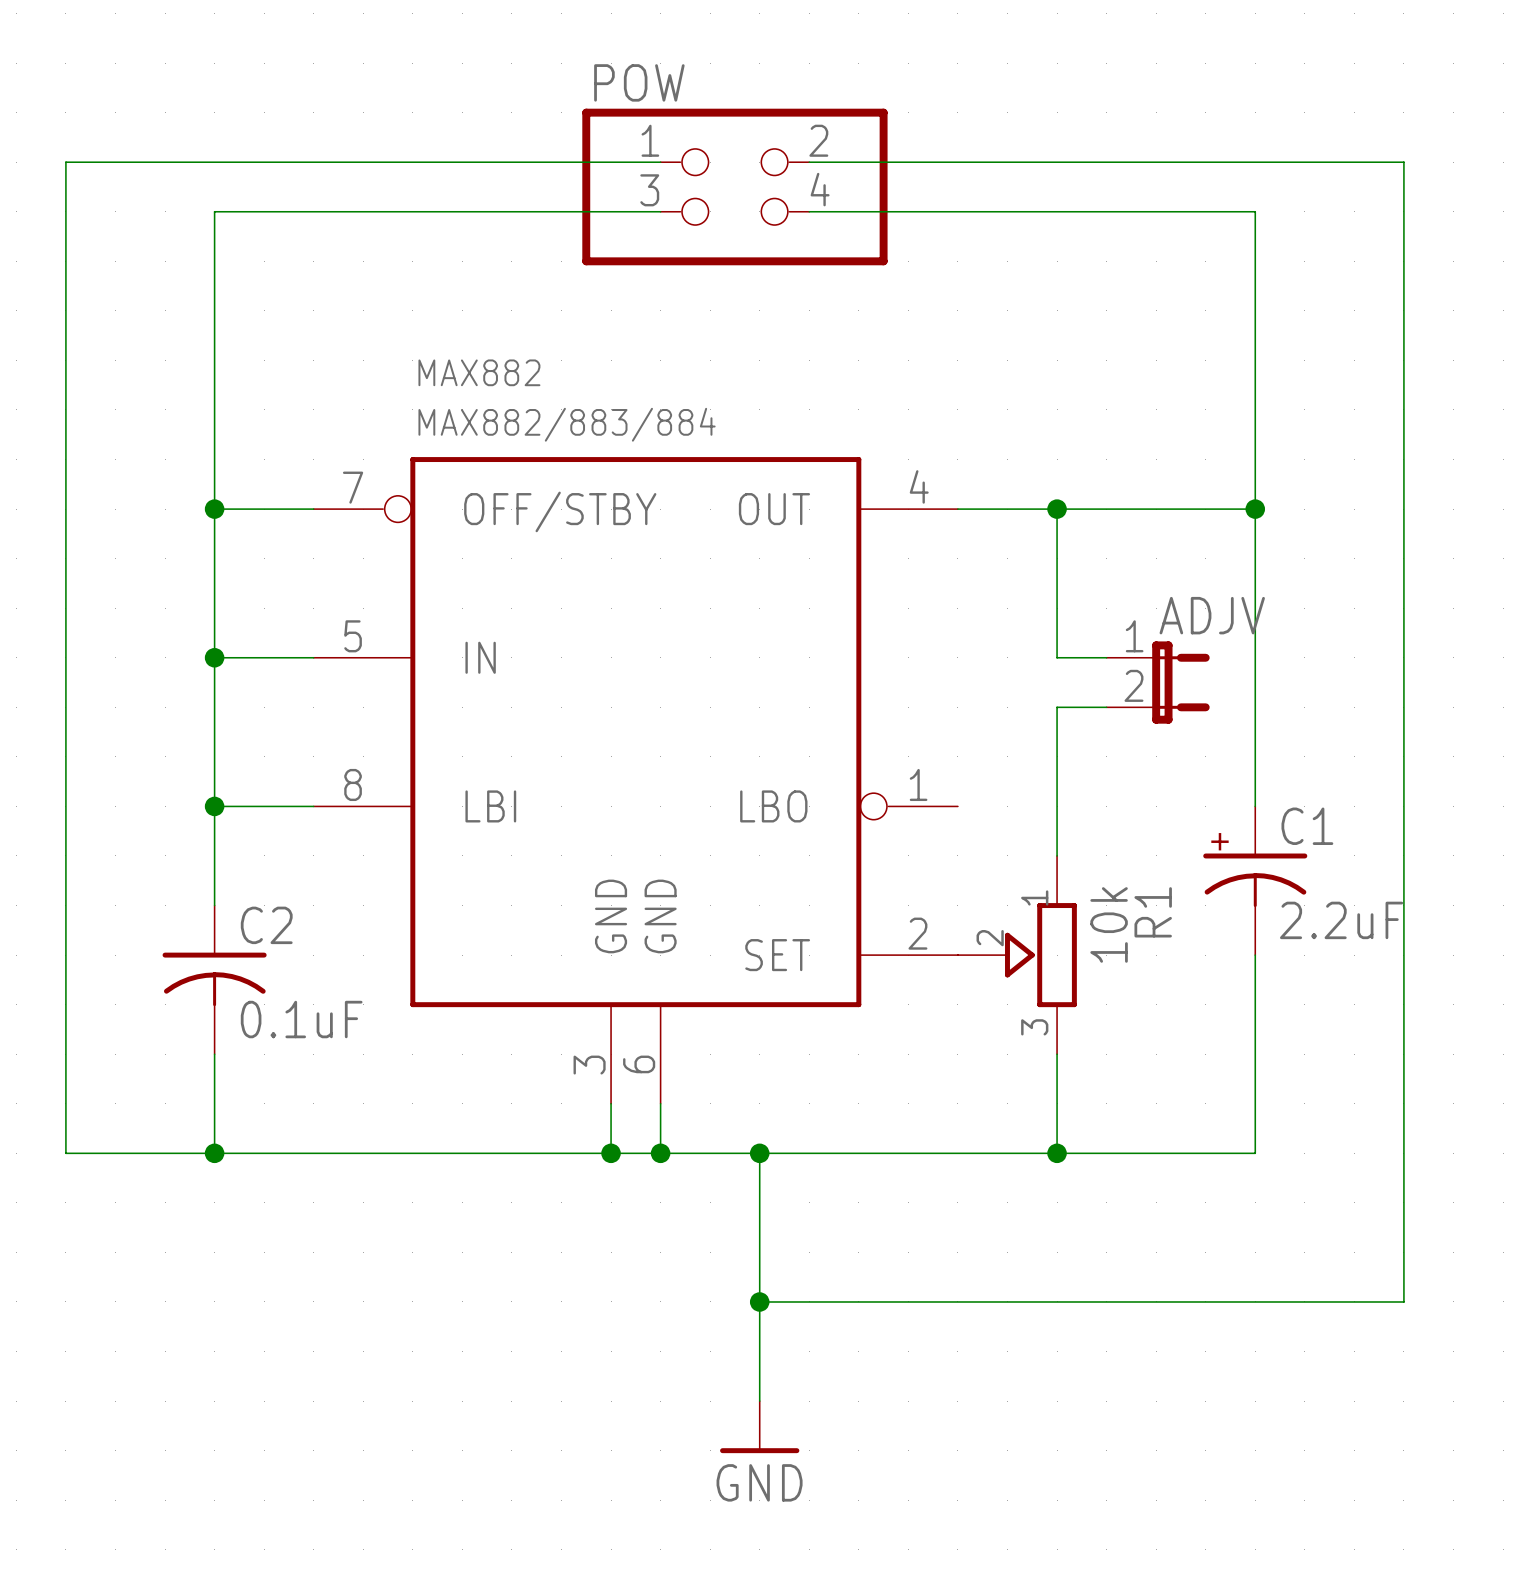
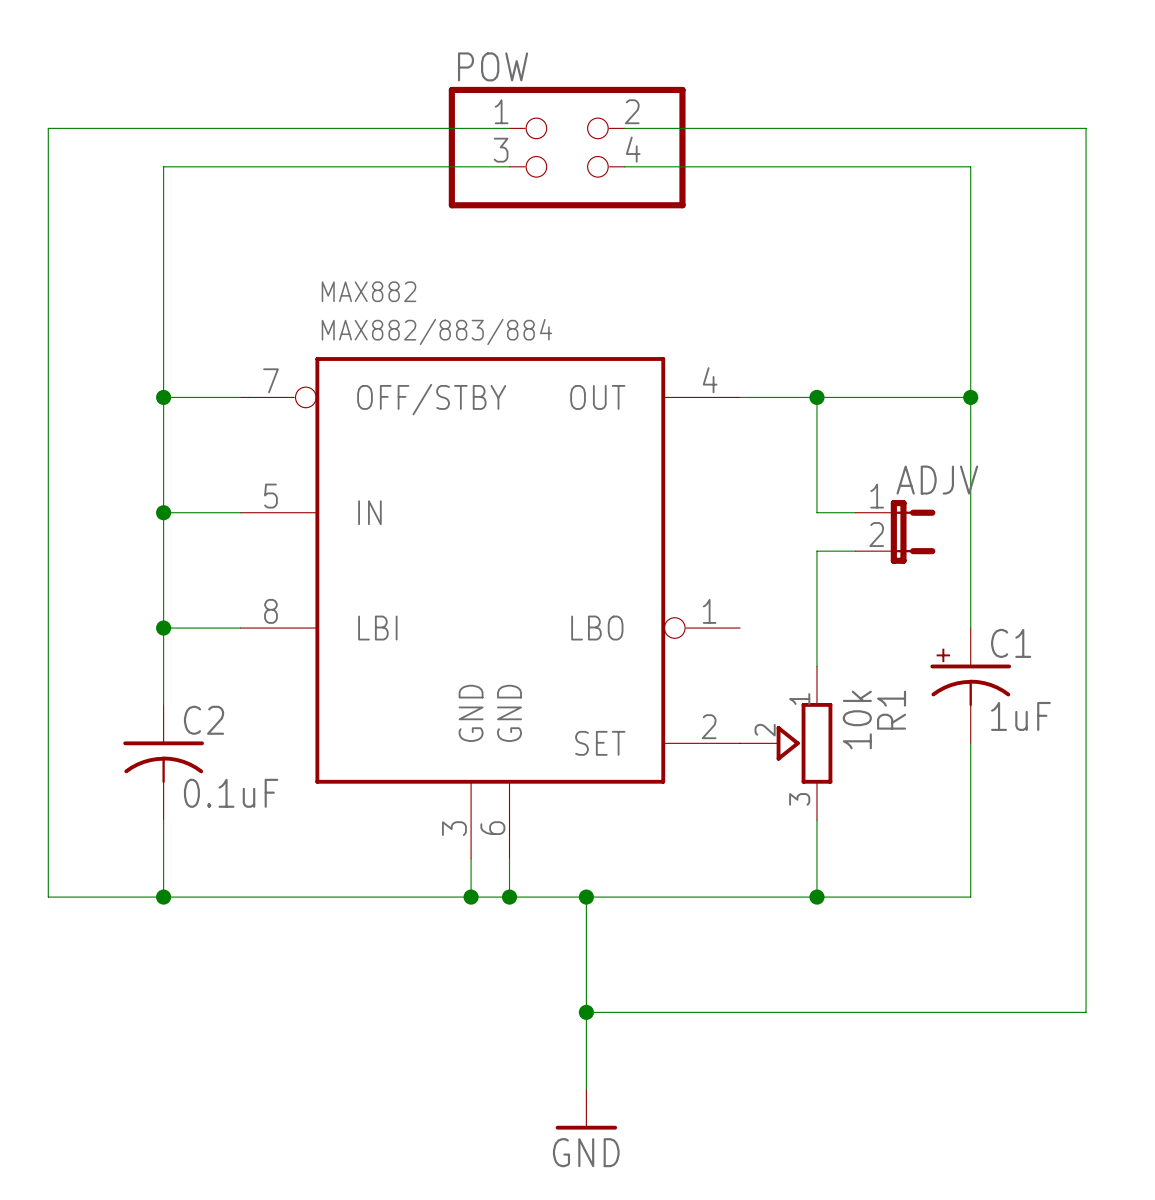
C1 value: 2.2uF (1341, 920) -> 1uF (1020, 716)

